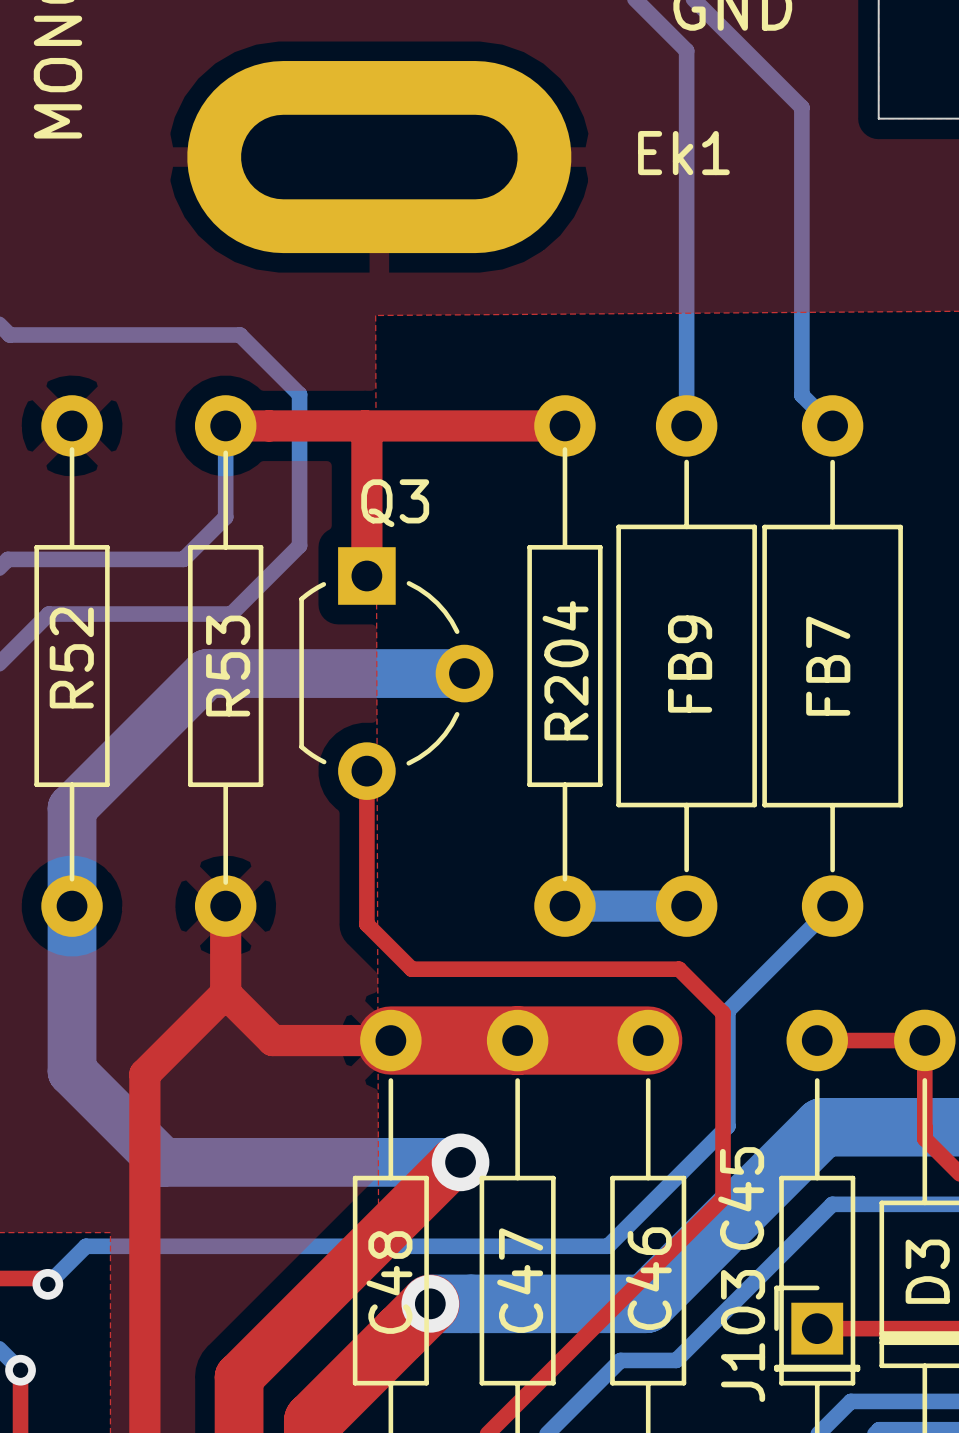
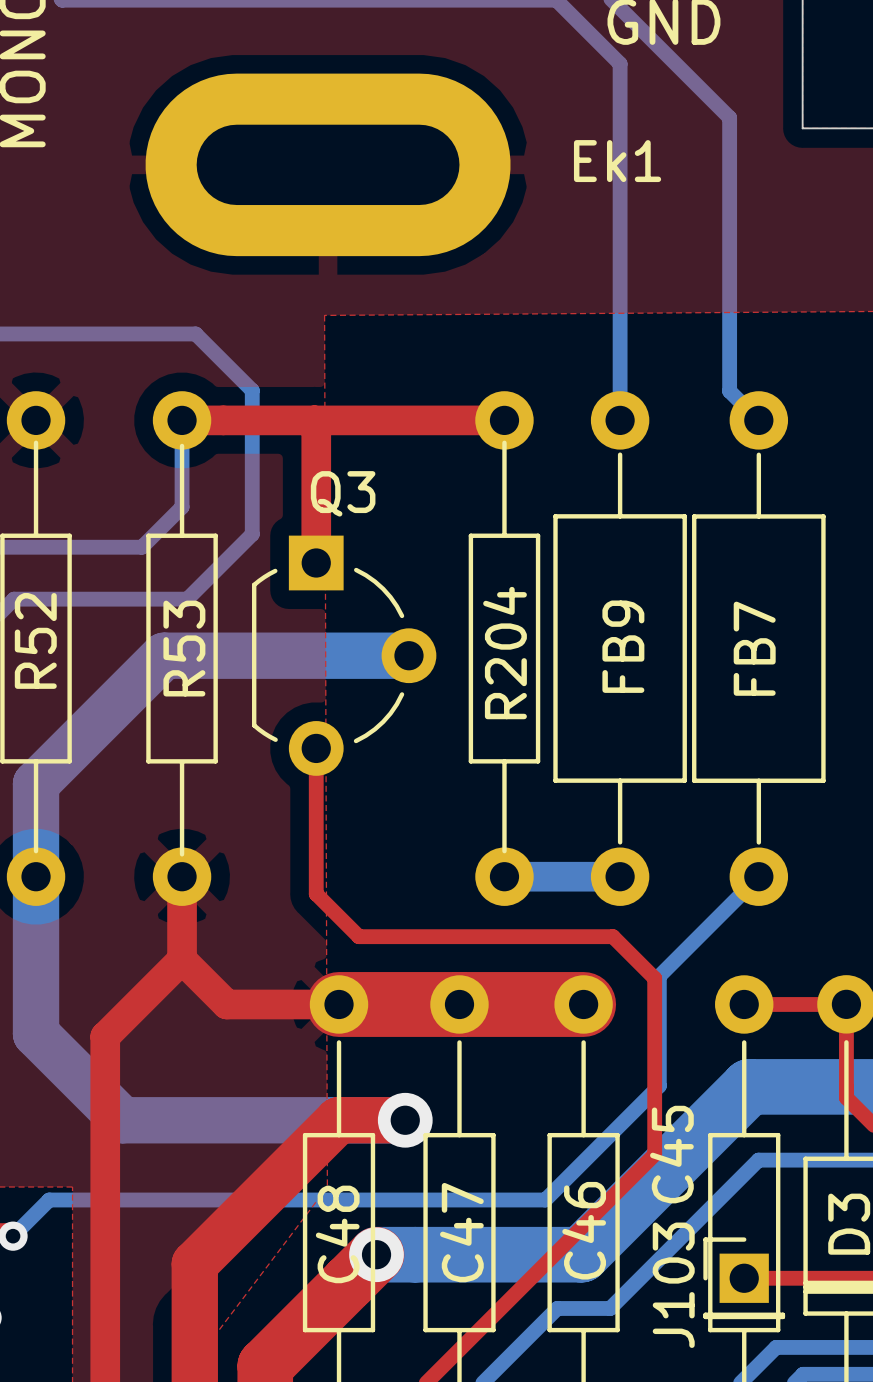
top track: (453, 1162) (239, 1377) -> (398, 1120) (338, 1120) (194, 1263) (194, 1324)

